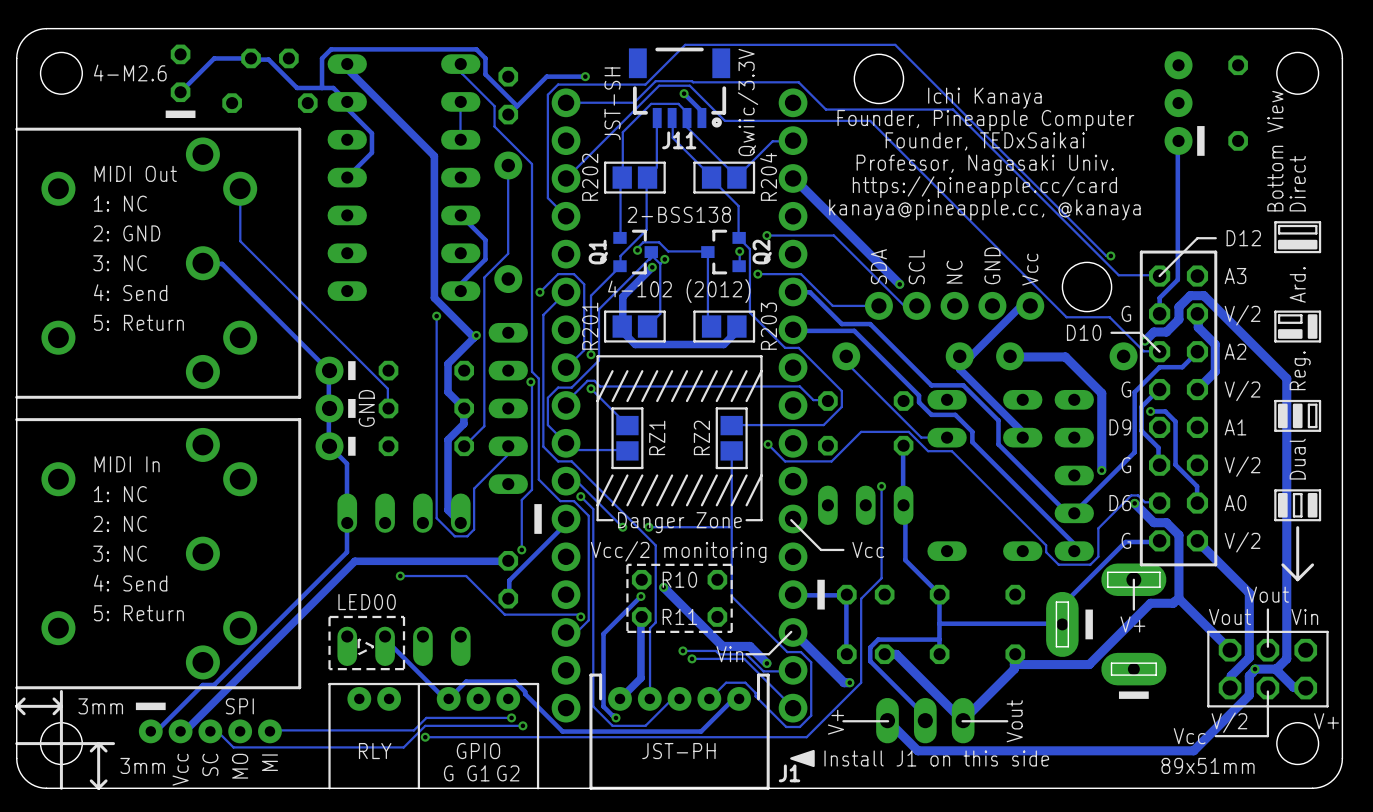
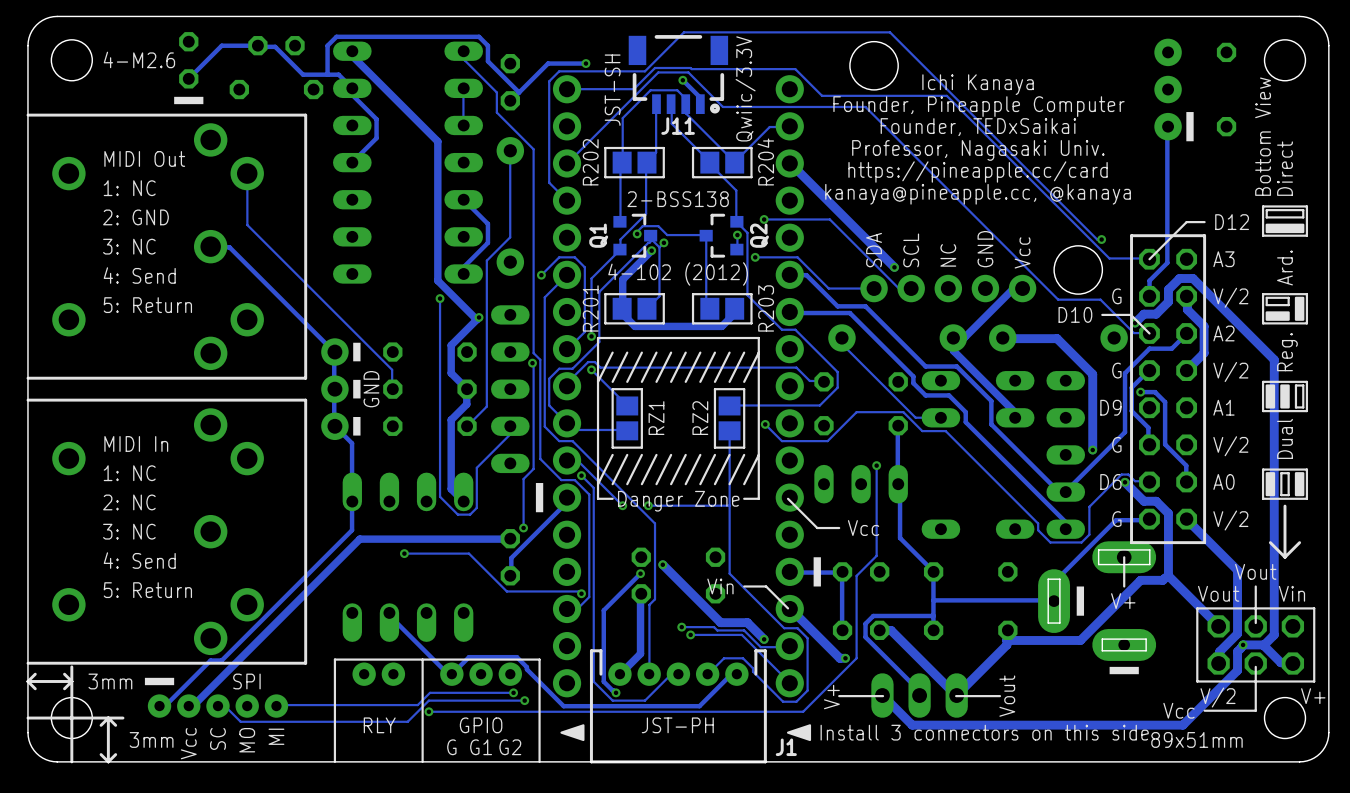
text: Vcc/2 monitoring (678, 552) -> none
line: (731, 564) (627, 564) (627, 631) (731, 631) (731, 564) -> none
text: R10 (679, 579) -> none
text: LED00 (367, 602) -> none
line: (404, 616) (404, 669) (329, 669) (329, 616) (404, 616) -> none
text: R11 (679, 616) -> none
line: (791, 631) (768, 654) (746, 654) -> (788, 608) (766, 586) (744, 586)
line: (358, 639) (373, 646) (358, 654) (358, 639) -> none
text position: Vin (729, 654) -> Vin (720, 586)
drawing: none -> [560, 724, 585, 742]
text: Install J1 on this side (936, 758) -> Install 3 connectors on this side (984, 732)

